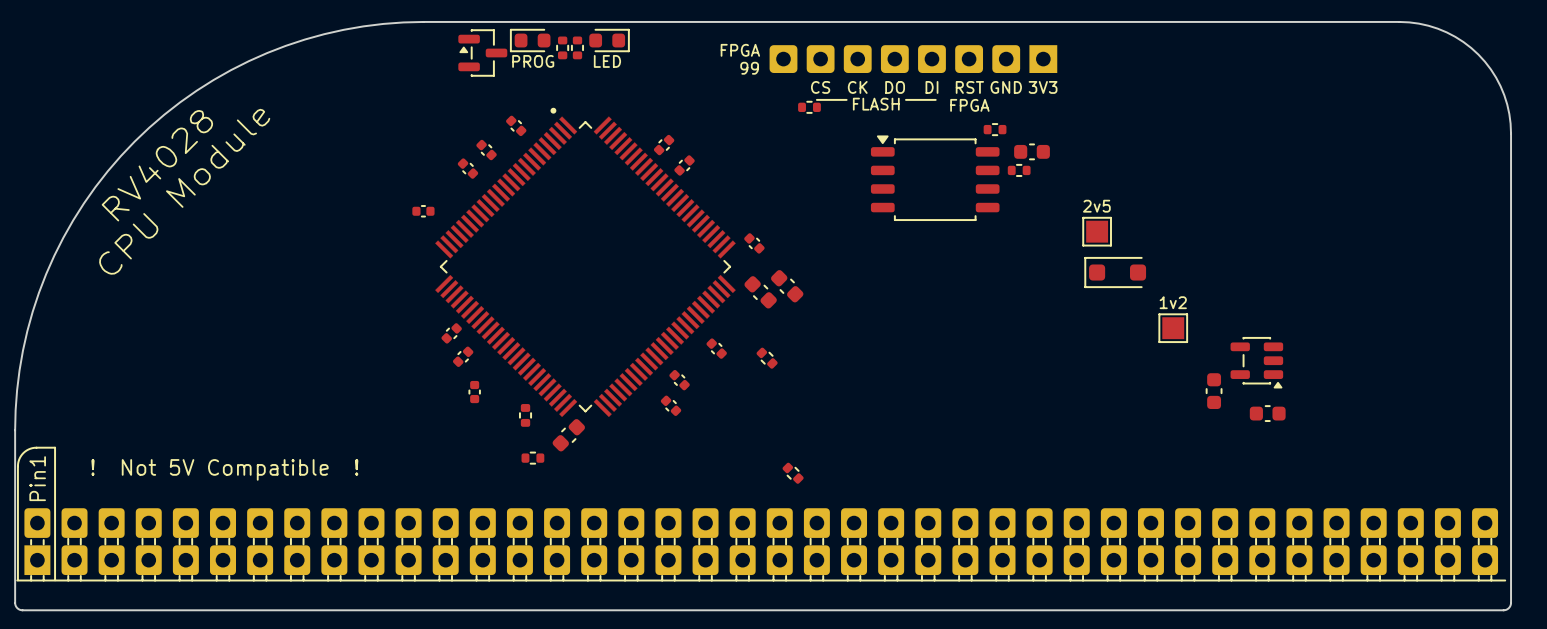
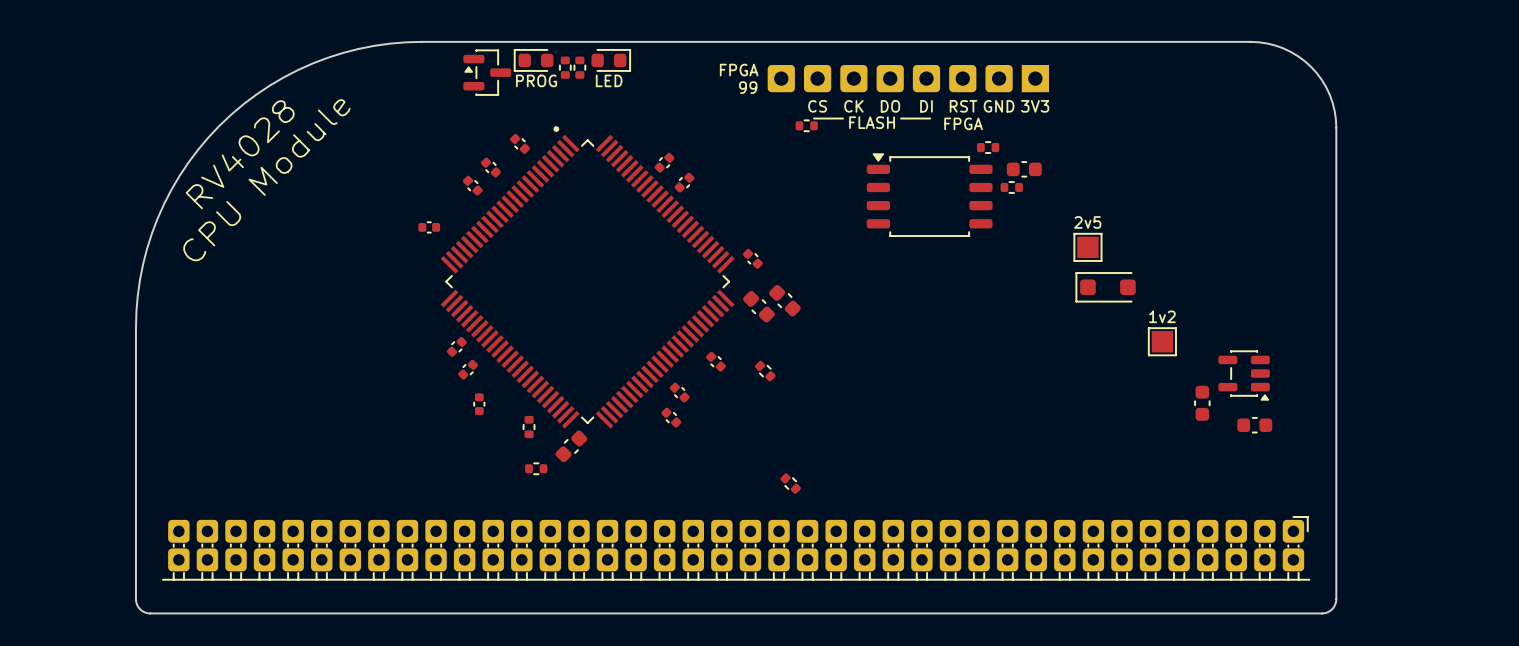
board edge: (423, 21) (1399, 21) (1428, 25) (1455, 36) (1478, 54) (1496, 77) (1504, 95) (1510, 123) (1510, 606) (1503, 610) (22, 610) (18, 608) (15, 602) (15, 430) (19, 370) (27, 331) (39, 292) (54, 255) (83, 203) (120, 156) (149, 127) (180, 102) (230, 70) (285, 45) (324, 34) (363, 26) (423, 21) -> (421, 41) (373, 45) (342, 53) (297, 70) (269, 85) (243, 104) (208, 137) (179, 175) (164, 203) (147, 248) (140, 279) (136, 311) (135, 599) (137, 605) (142, 611) (150, 613) (1322, 613) (1329, 611) (1334, 606) (1336, 599) (1335, 119) (1332, 102) (1326, 87) (1311, 66) (1298, 56) (1275, 45) (1250, 41) (421, 41)
text position: RV4028 (157, 165) -> RV4028 (240, 154)
text position: CPU Module (184, 191) -> CPU Module (266, 180)
text: ! Not 5V Compatible ! (224, 469) -> none
part: (761, 514) -> none
part: none -> (736, 548)

